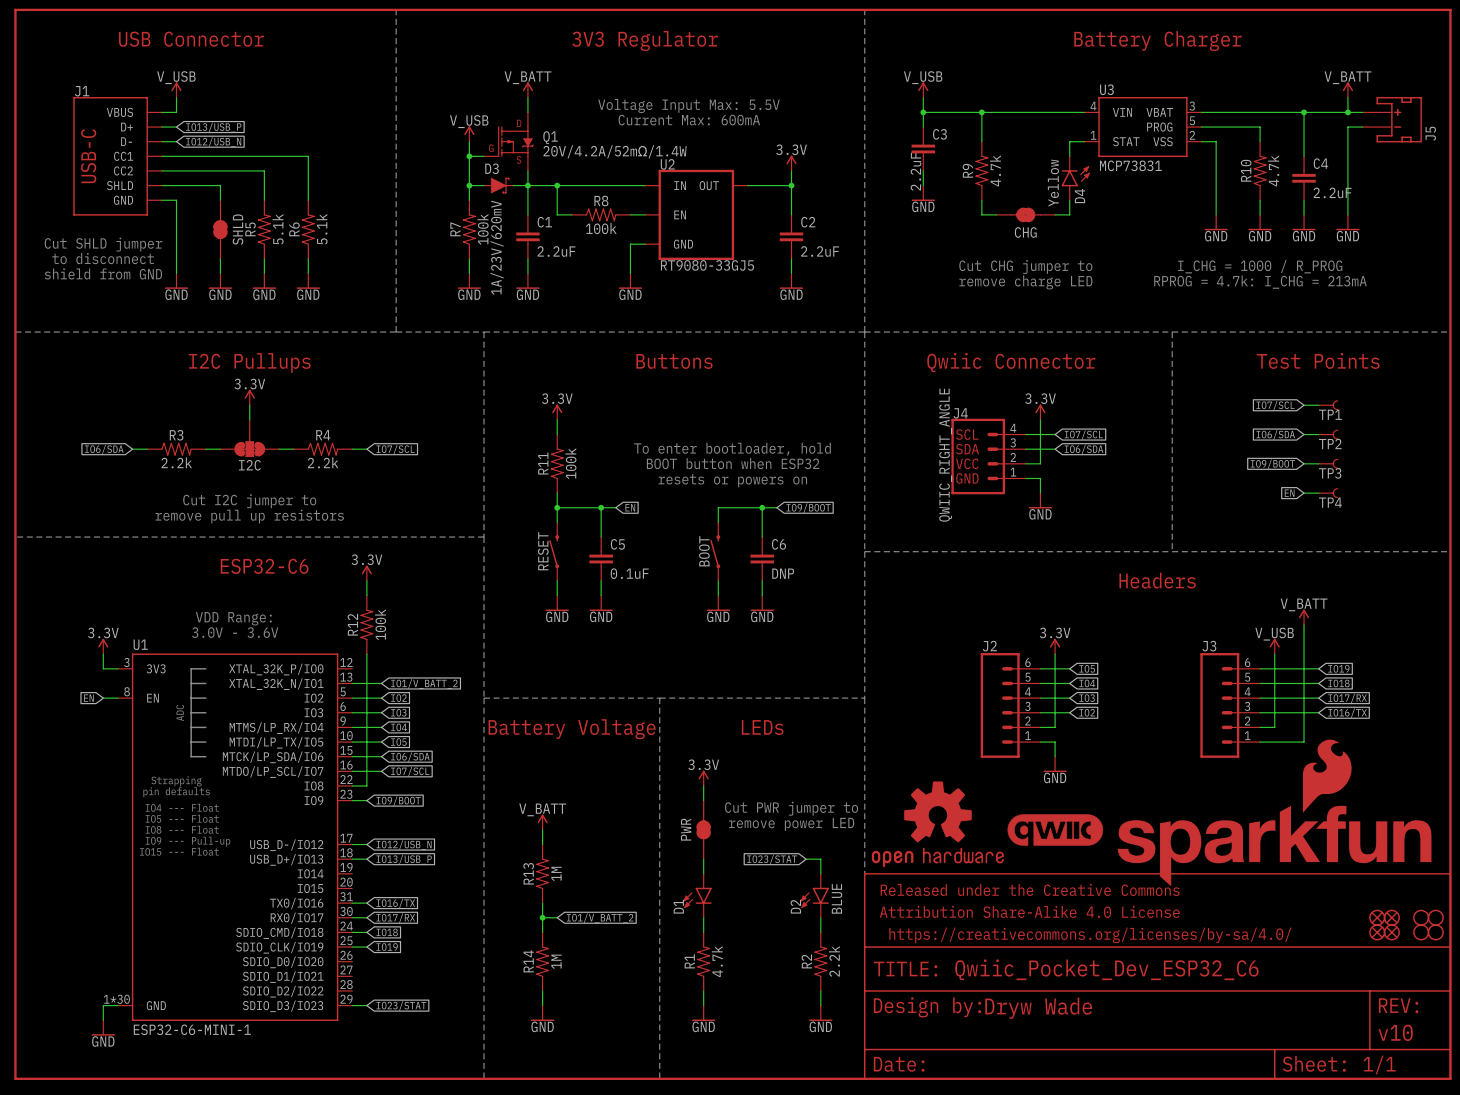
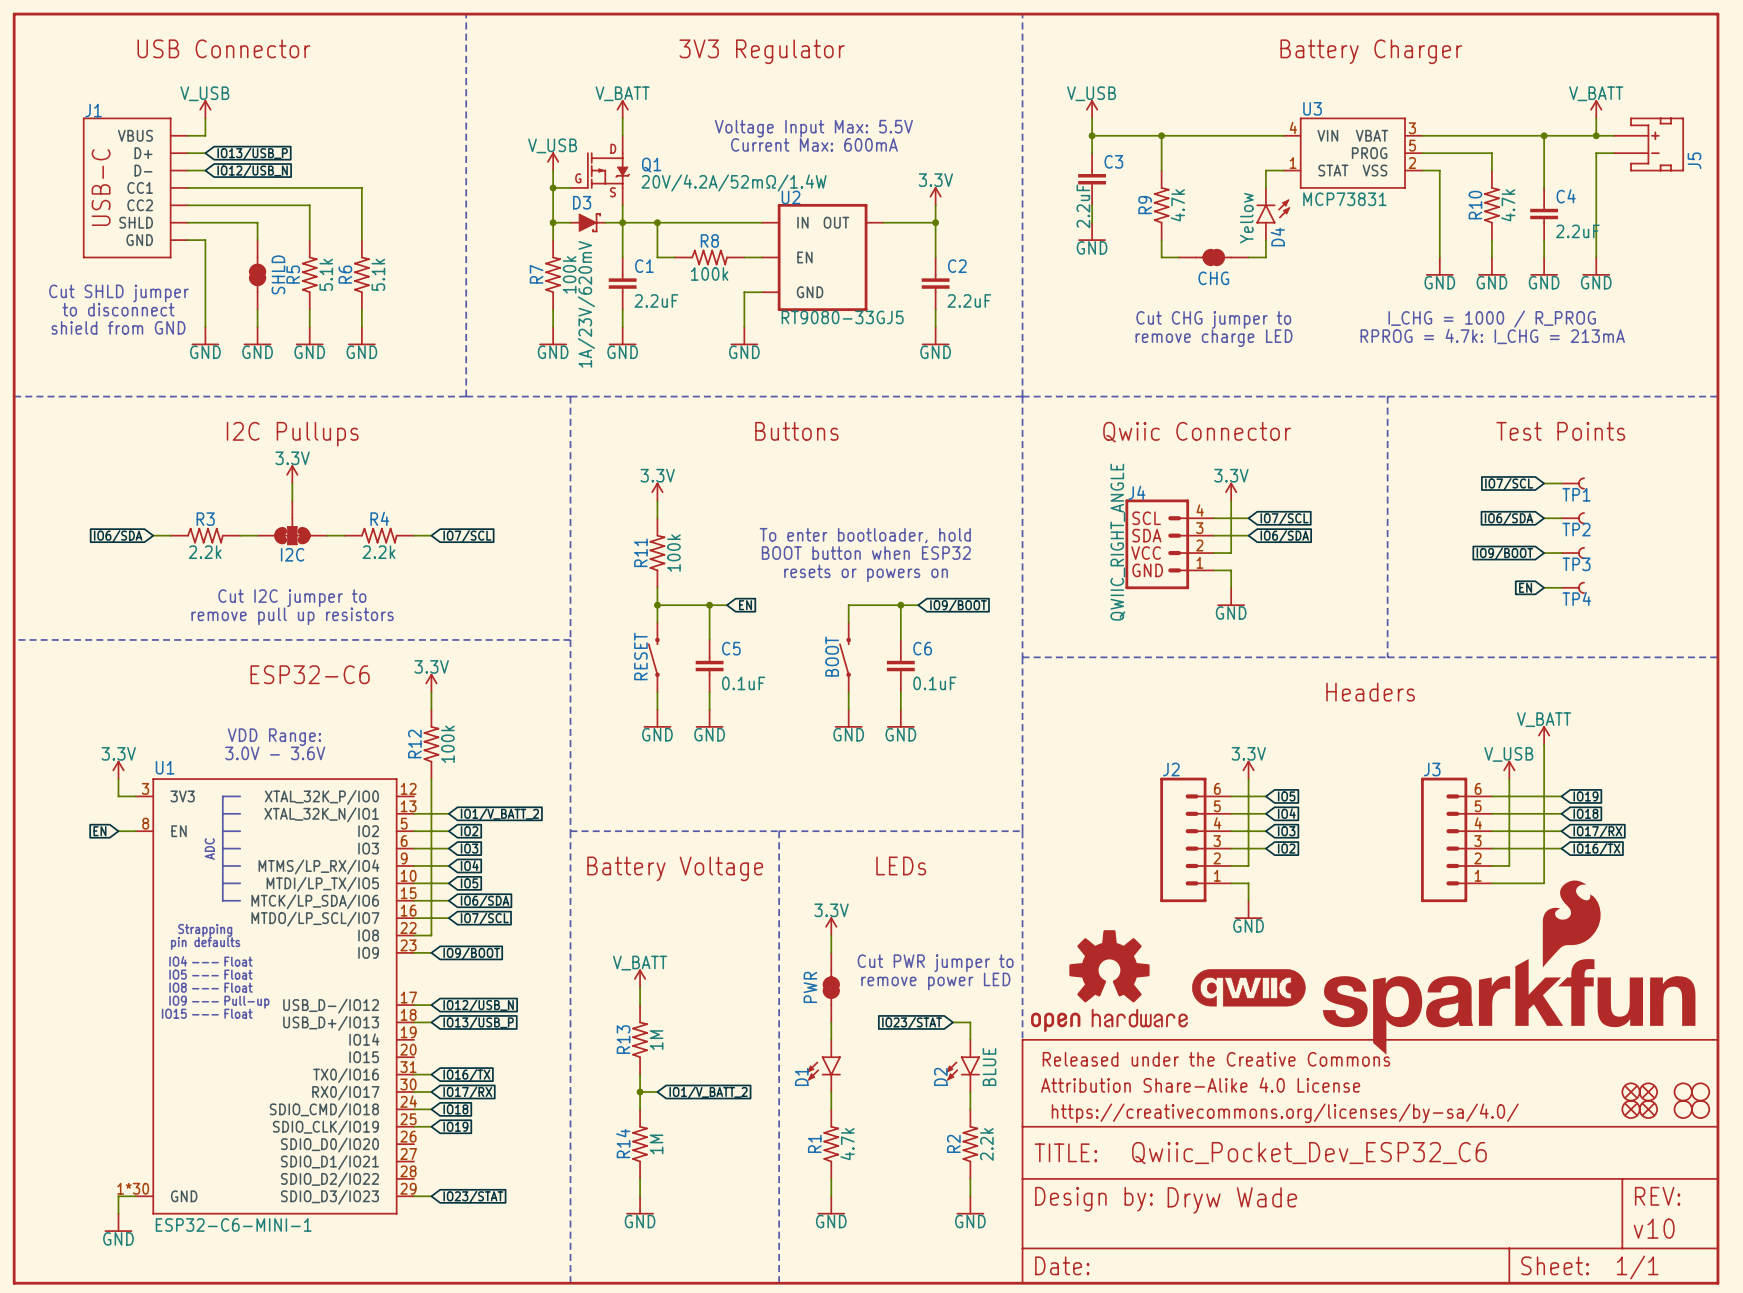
C6 value: DNP (783, 573) -> 0.1uF (934, 683)

